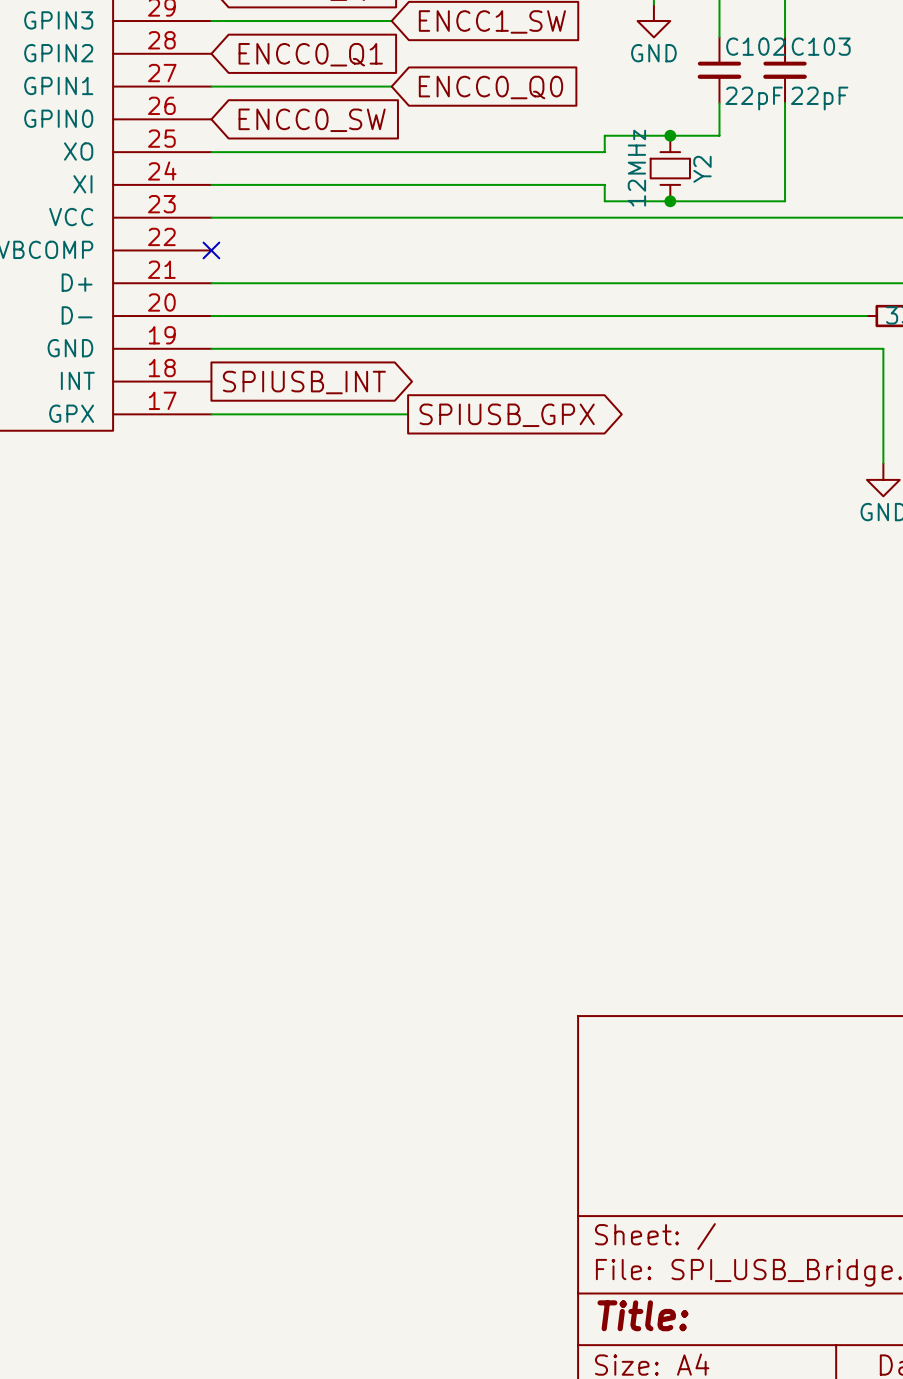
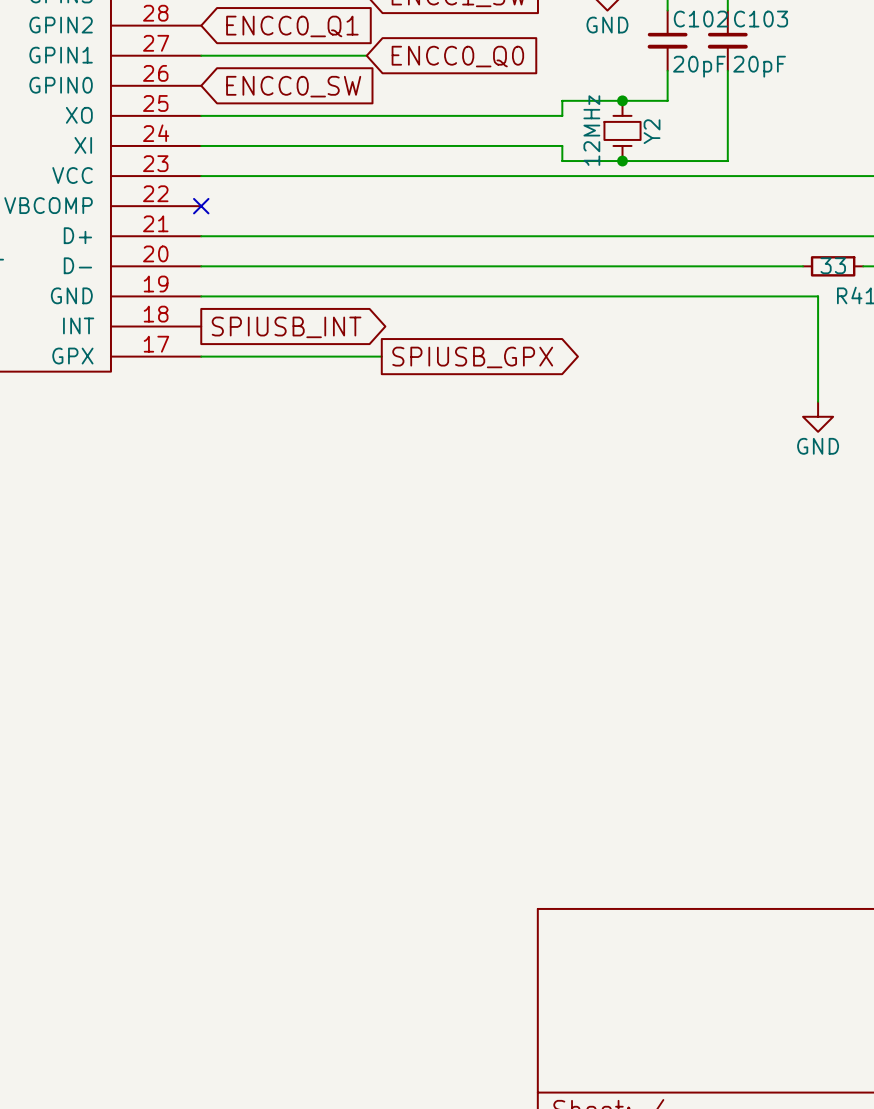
C102 value: 22pF (754, 98) -> 20pF (699, 66)
C103 value: 22pF (819, 98) -> 20pF (759, 66)

